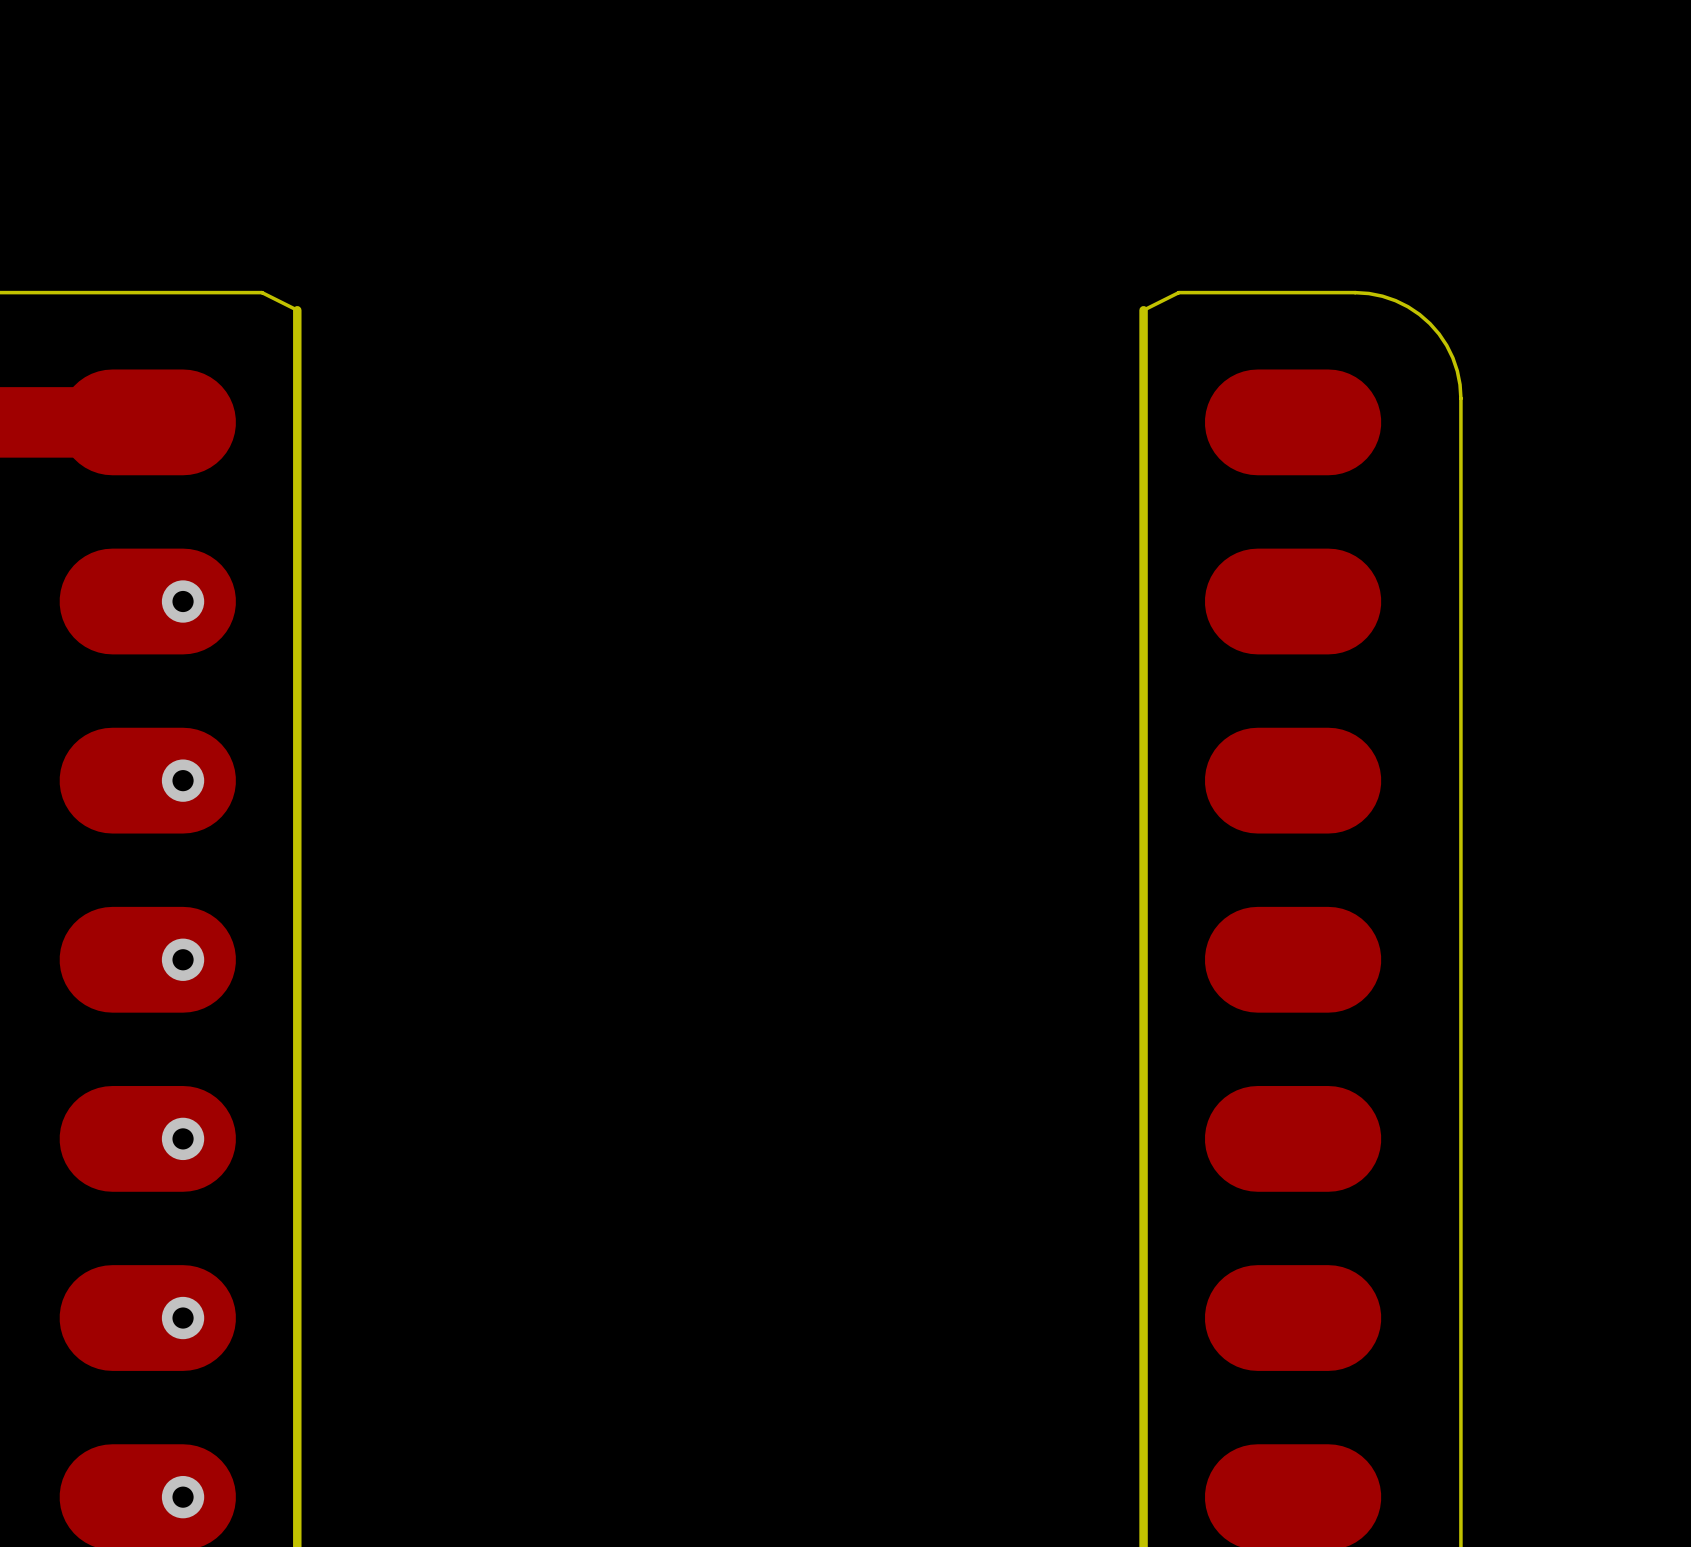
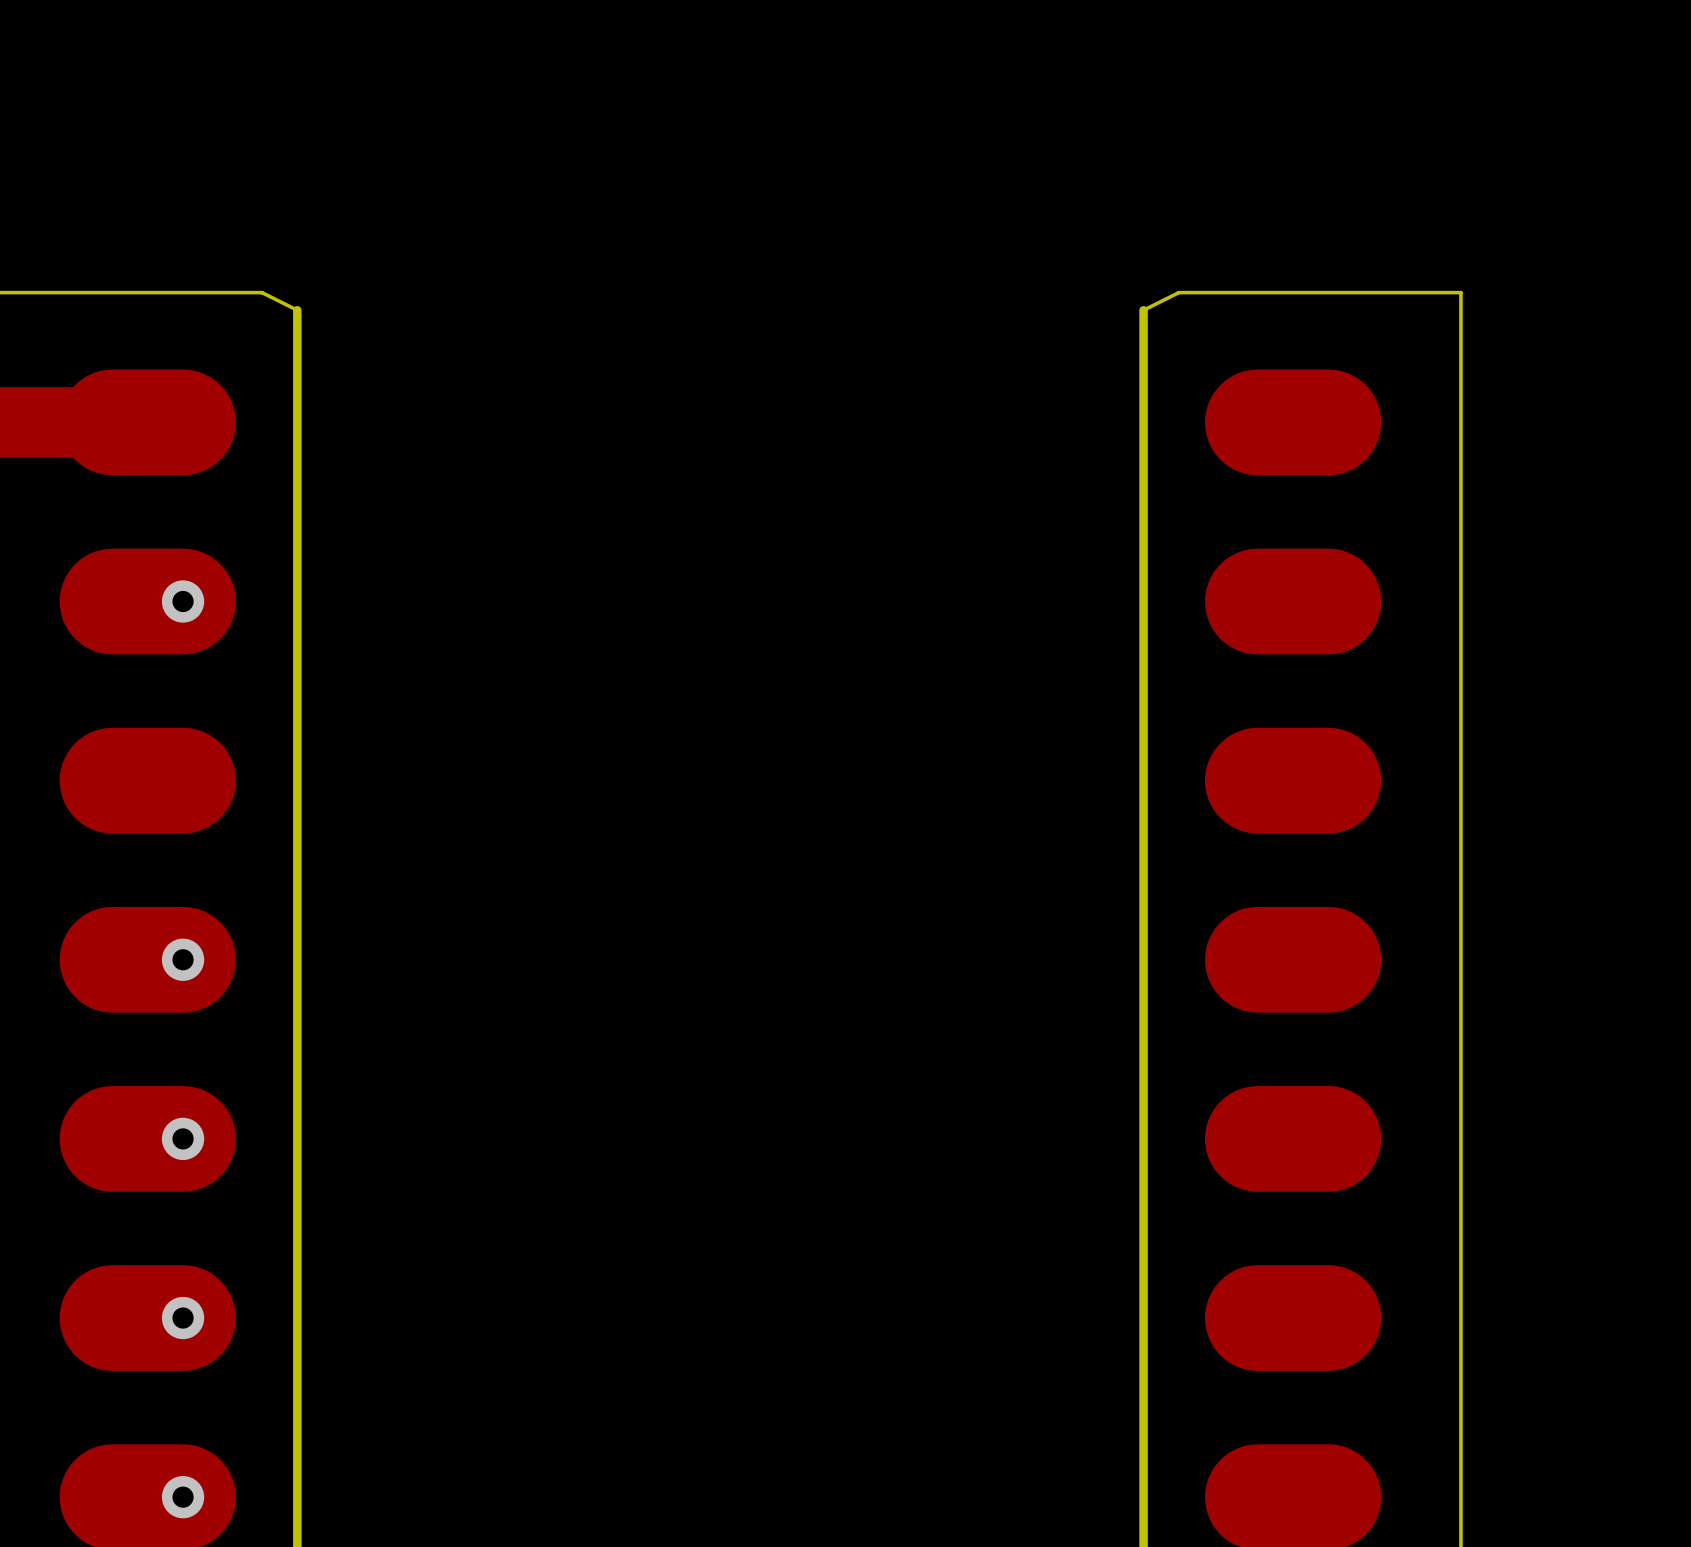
board edge: (1355, 292) (1368, 293) (1395, 300) (1419, 314) (1429, 323) (1439, 334) (1452, 357) (1457, 371) (1460, 398) -> (1355, 292) (1460, 292) (1460, 398)
via: (183, 780) -> none

